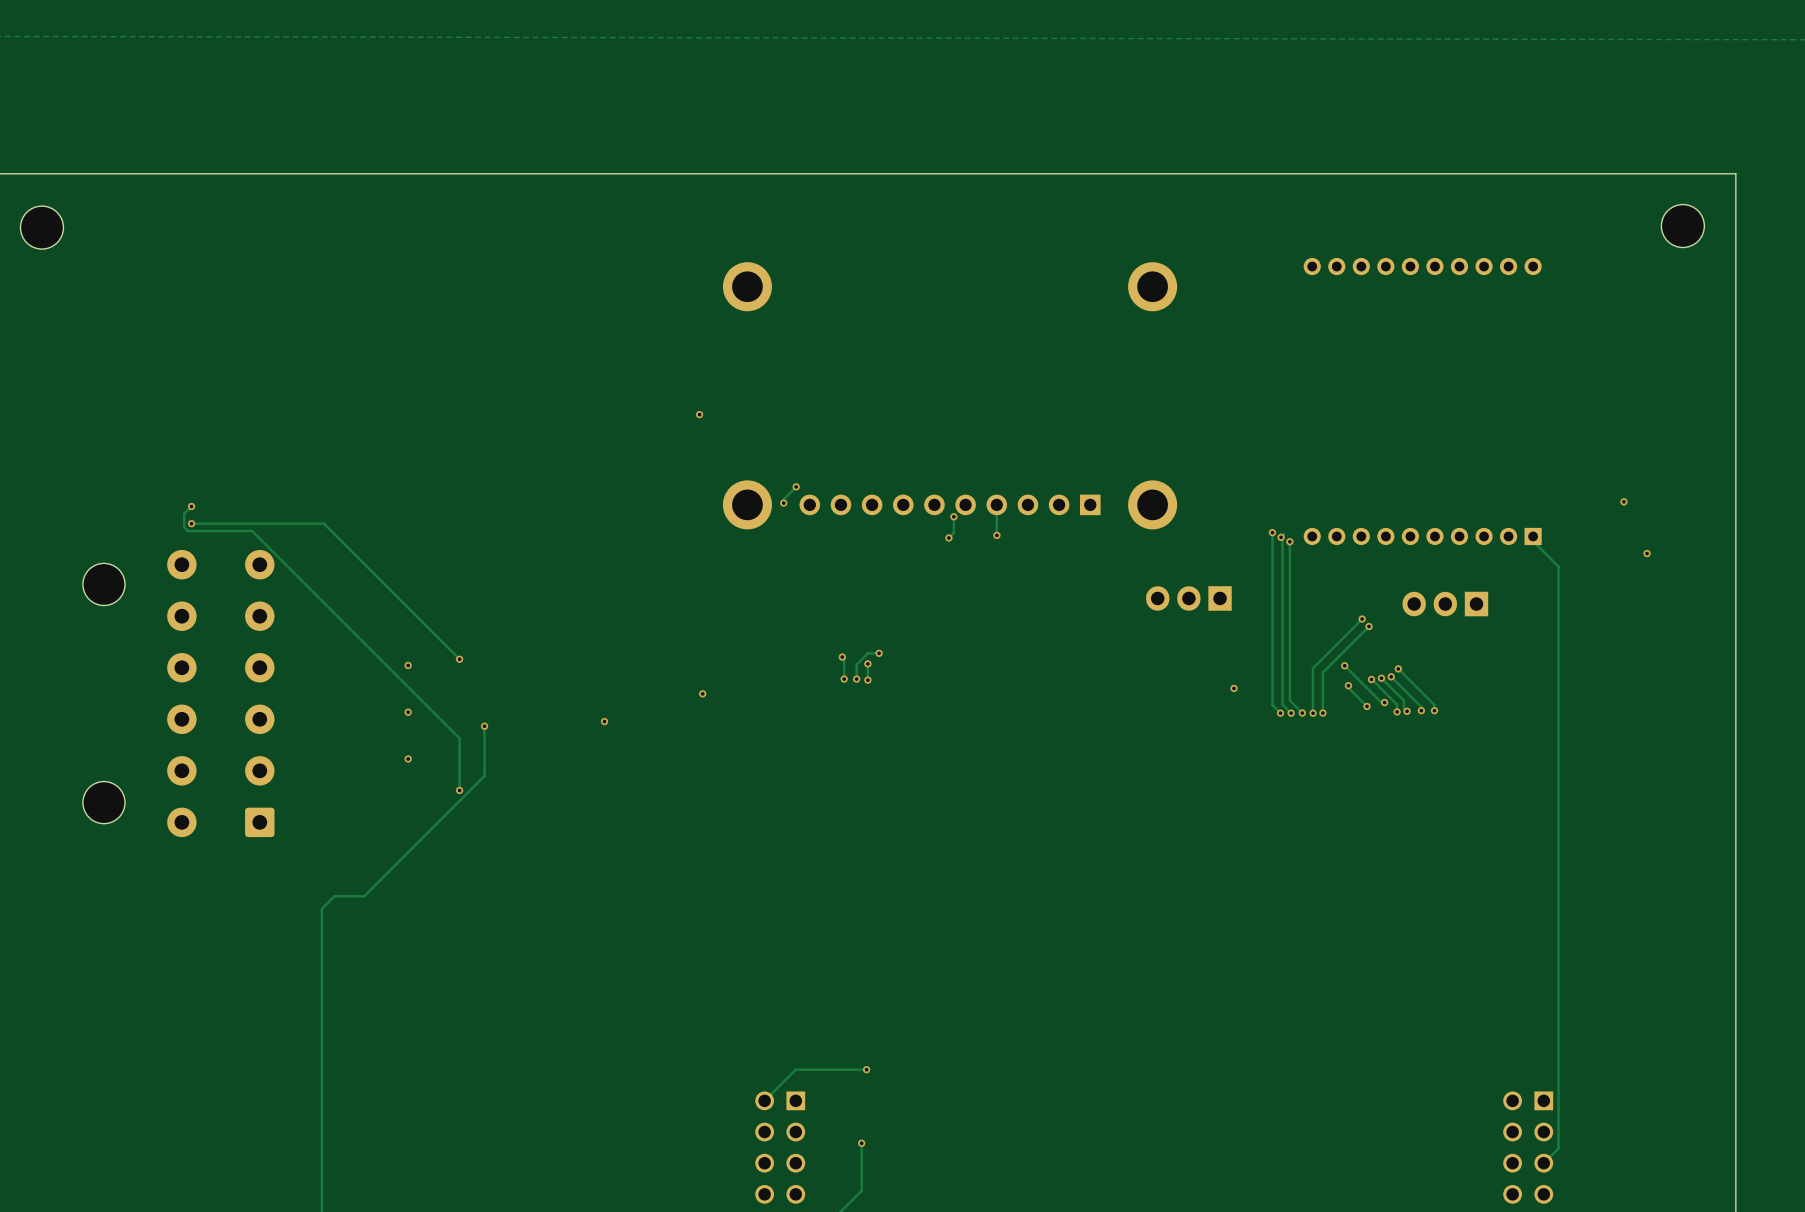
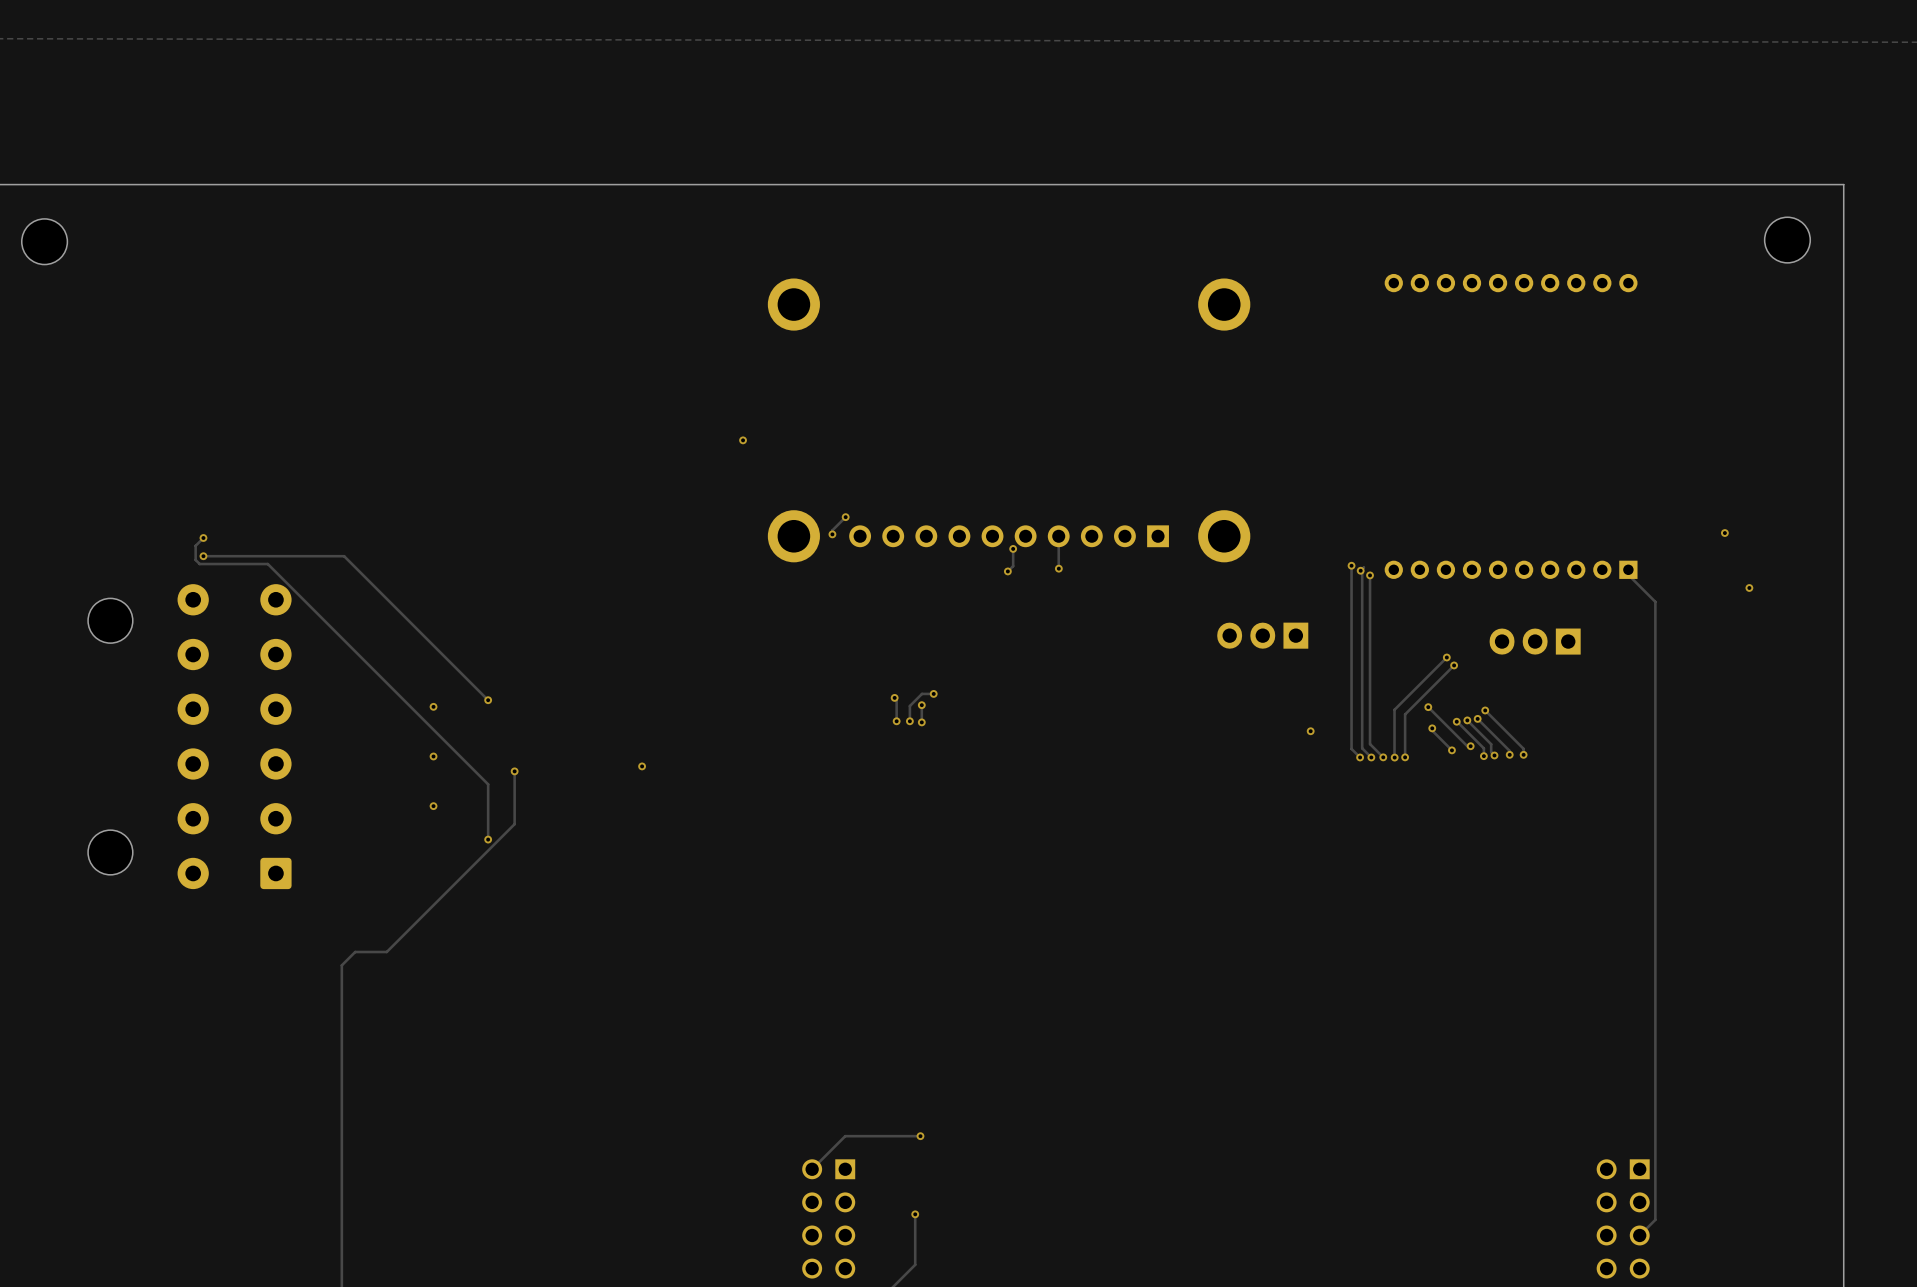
via: (702, 693) -> none

